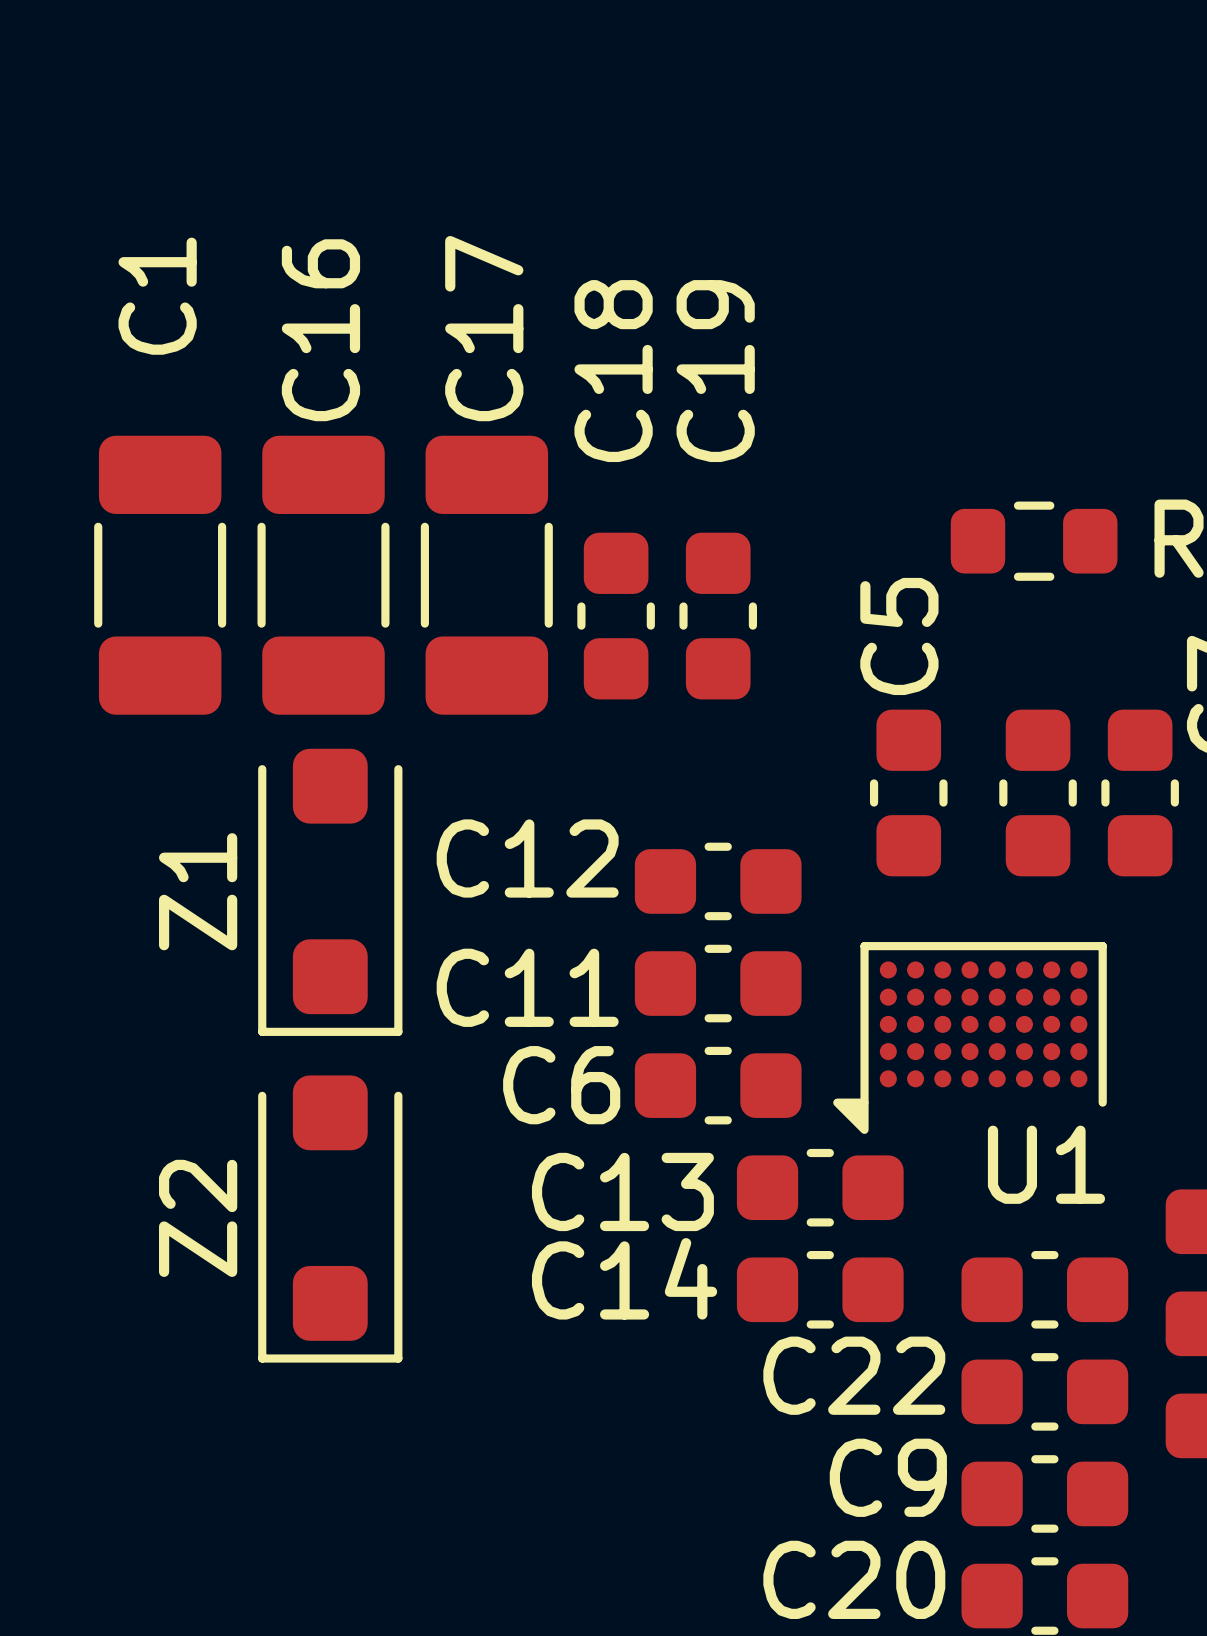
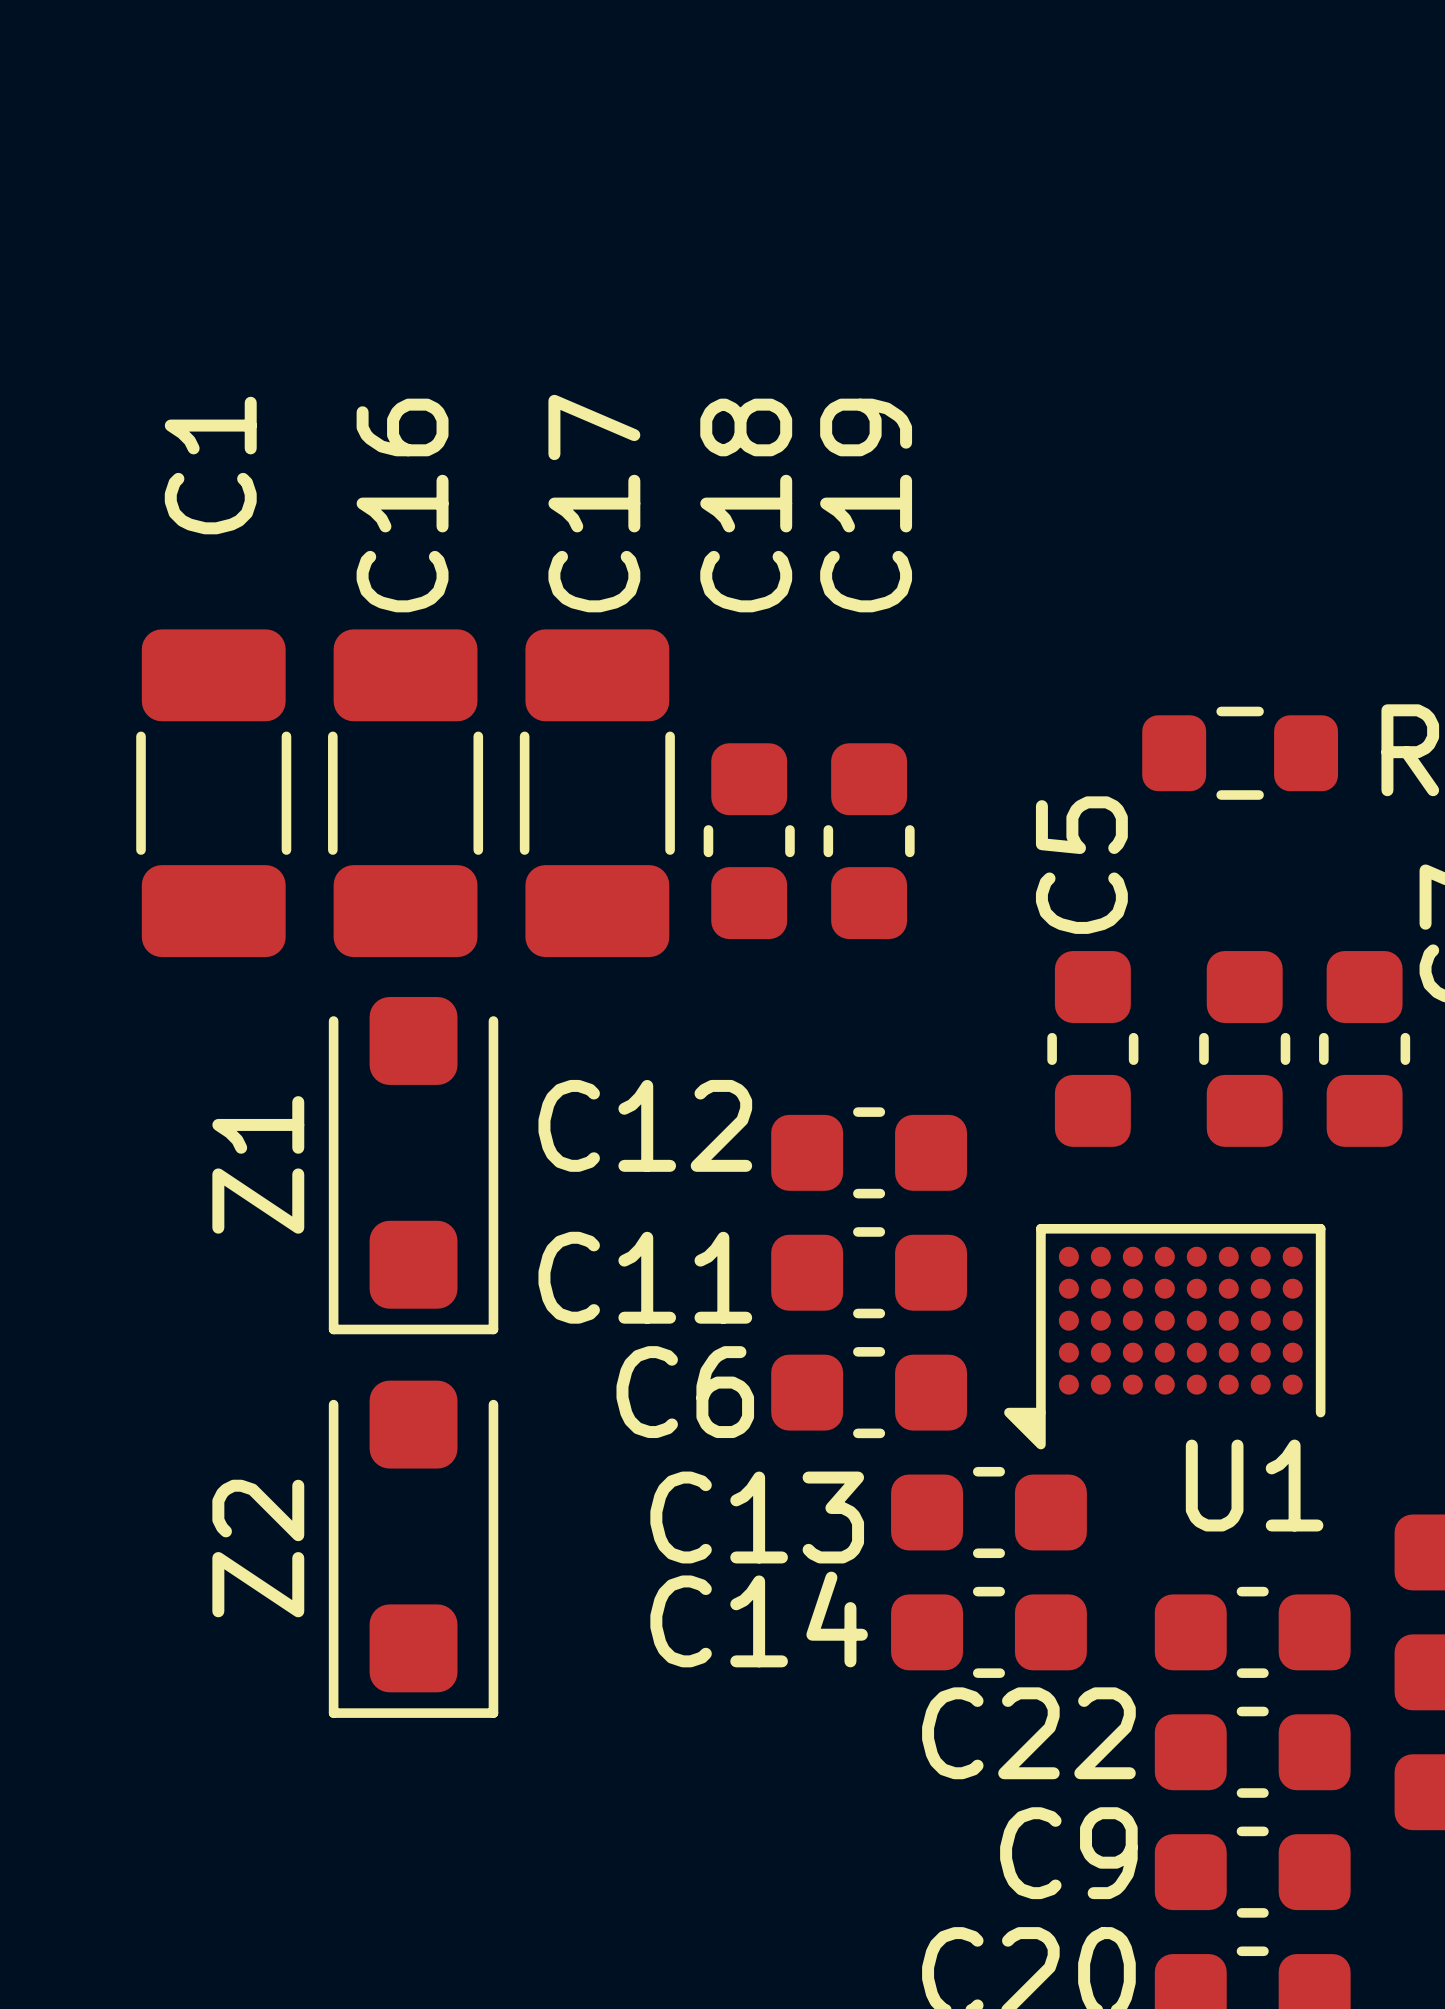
C18 name position: C18 (613, 371) -> C18 (746, 505)
C19 name position: C19 (715, 371) -> C19 (866, 505)

